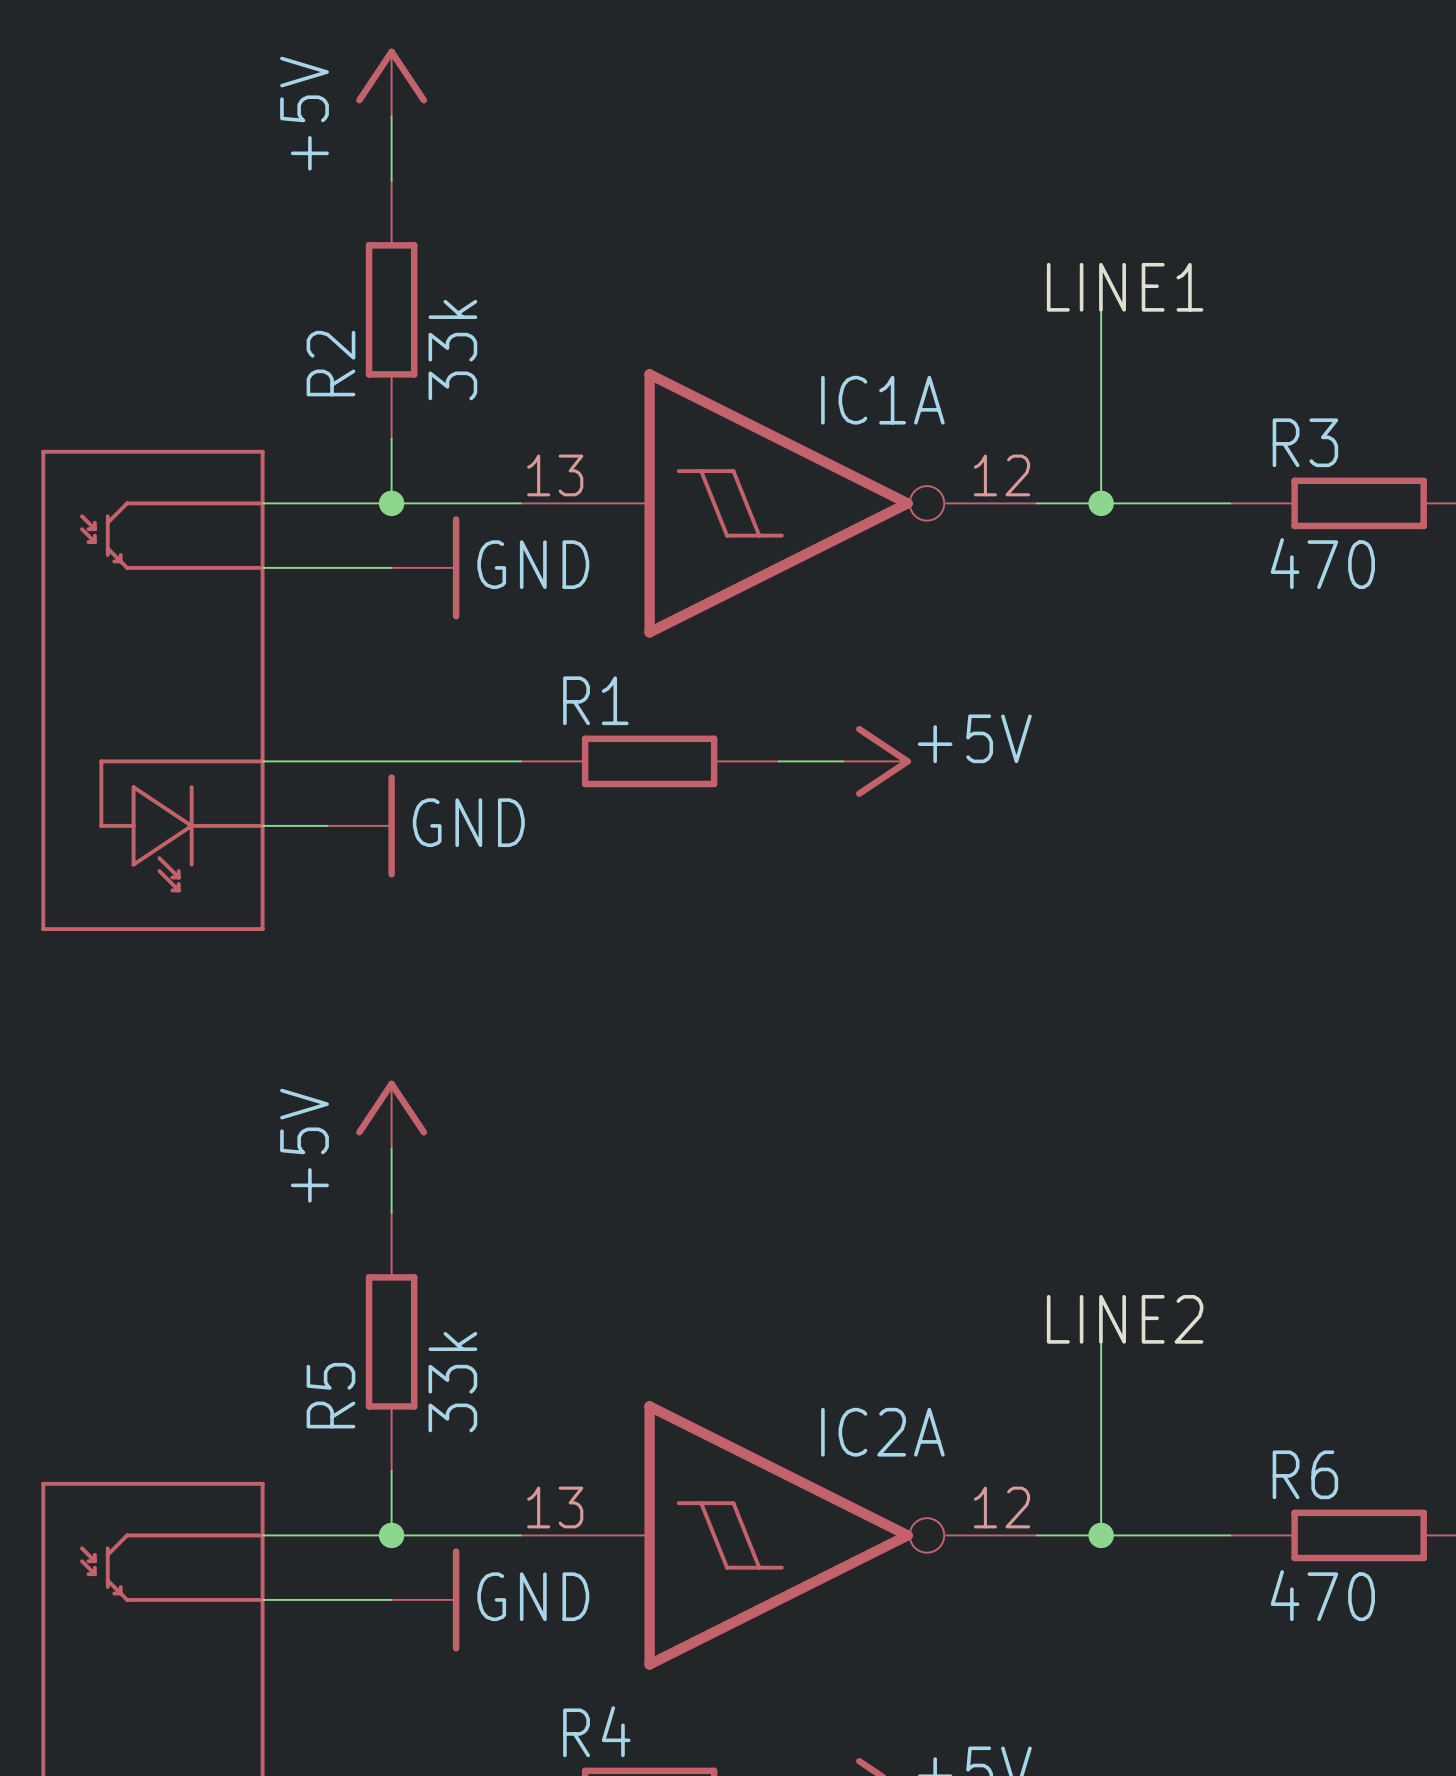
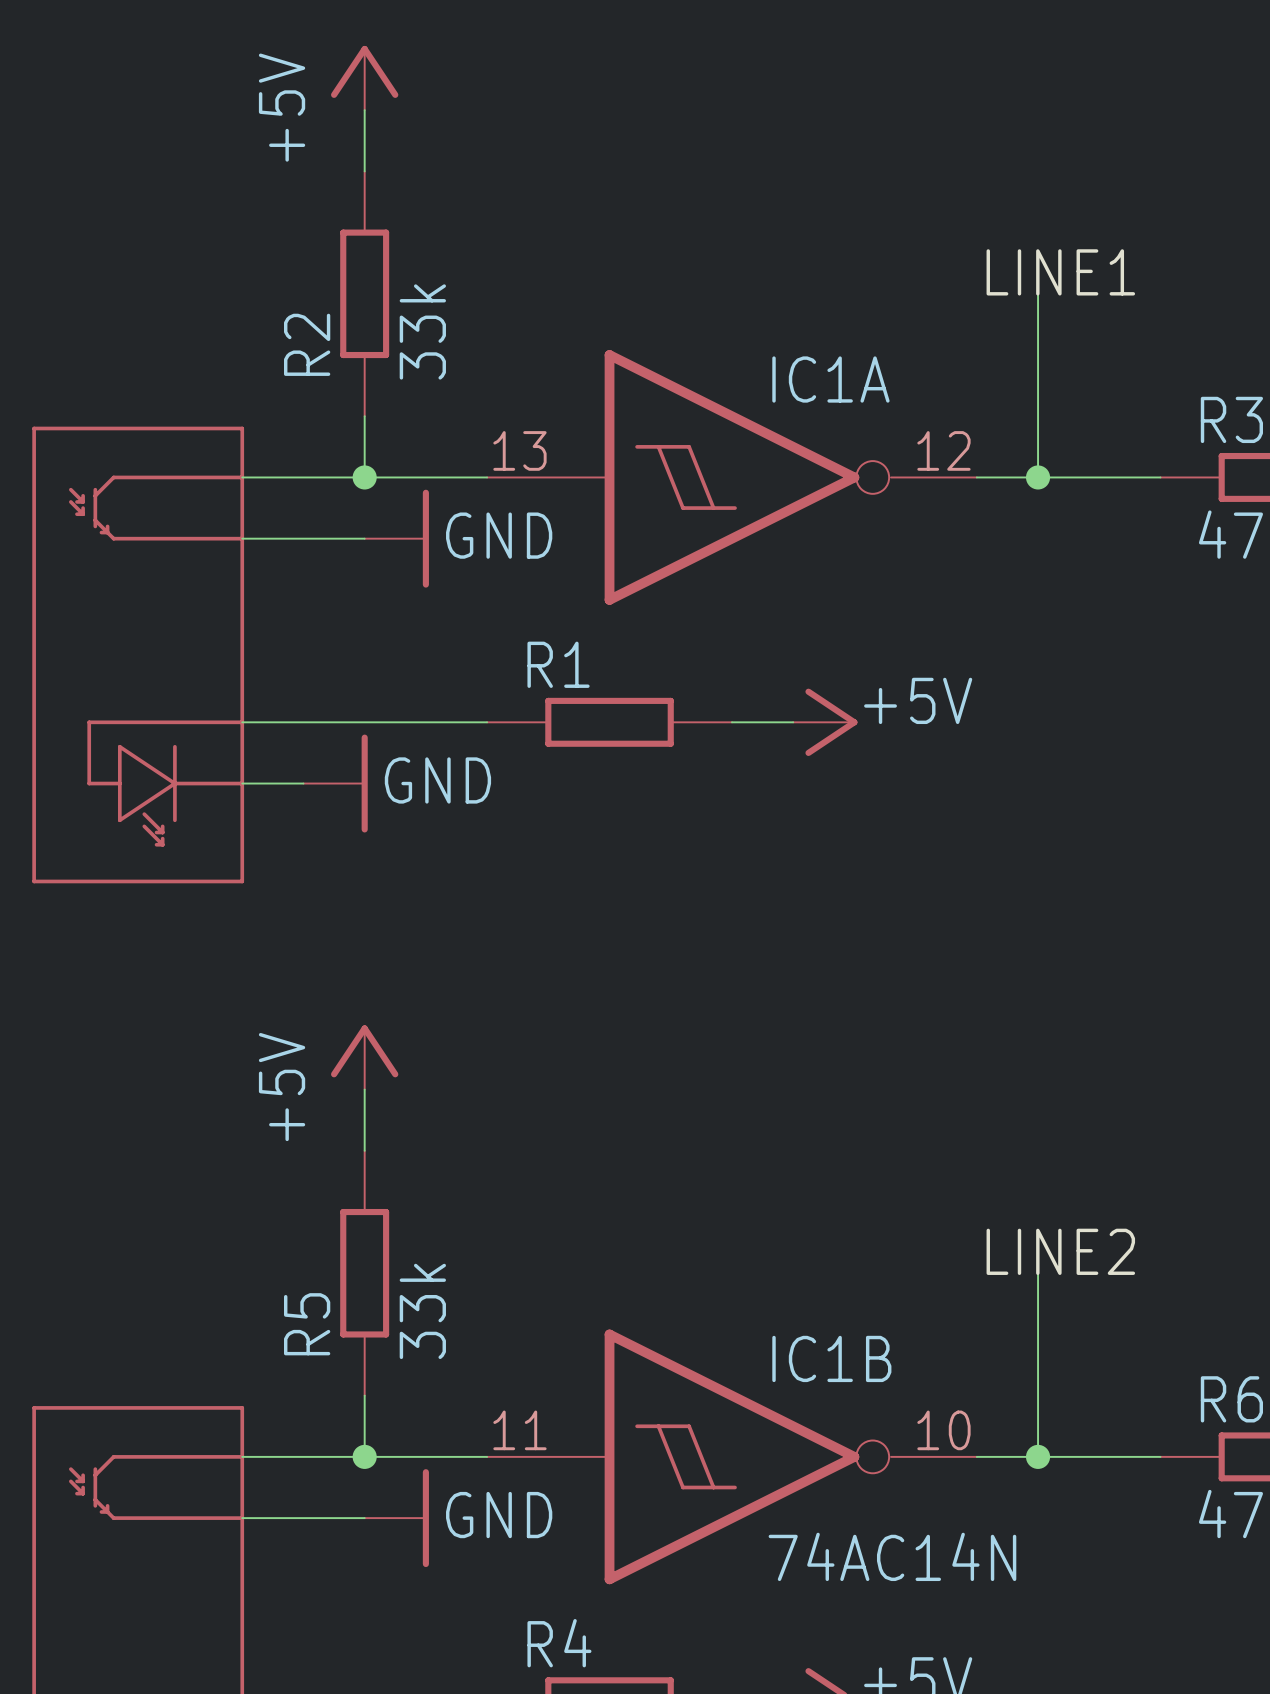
IC2A name: IC2A (882, 1432) -> IC1B (831, 1358)
IC2A pin number: 13 (555, 1507) -> 11 (519, 1430)
IC2A pin number: 12 (1002, 1507) -> 10 (943, 1430)
IC2A value: none -> 74AC14N (892, 1556)

